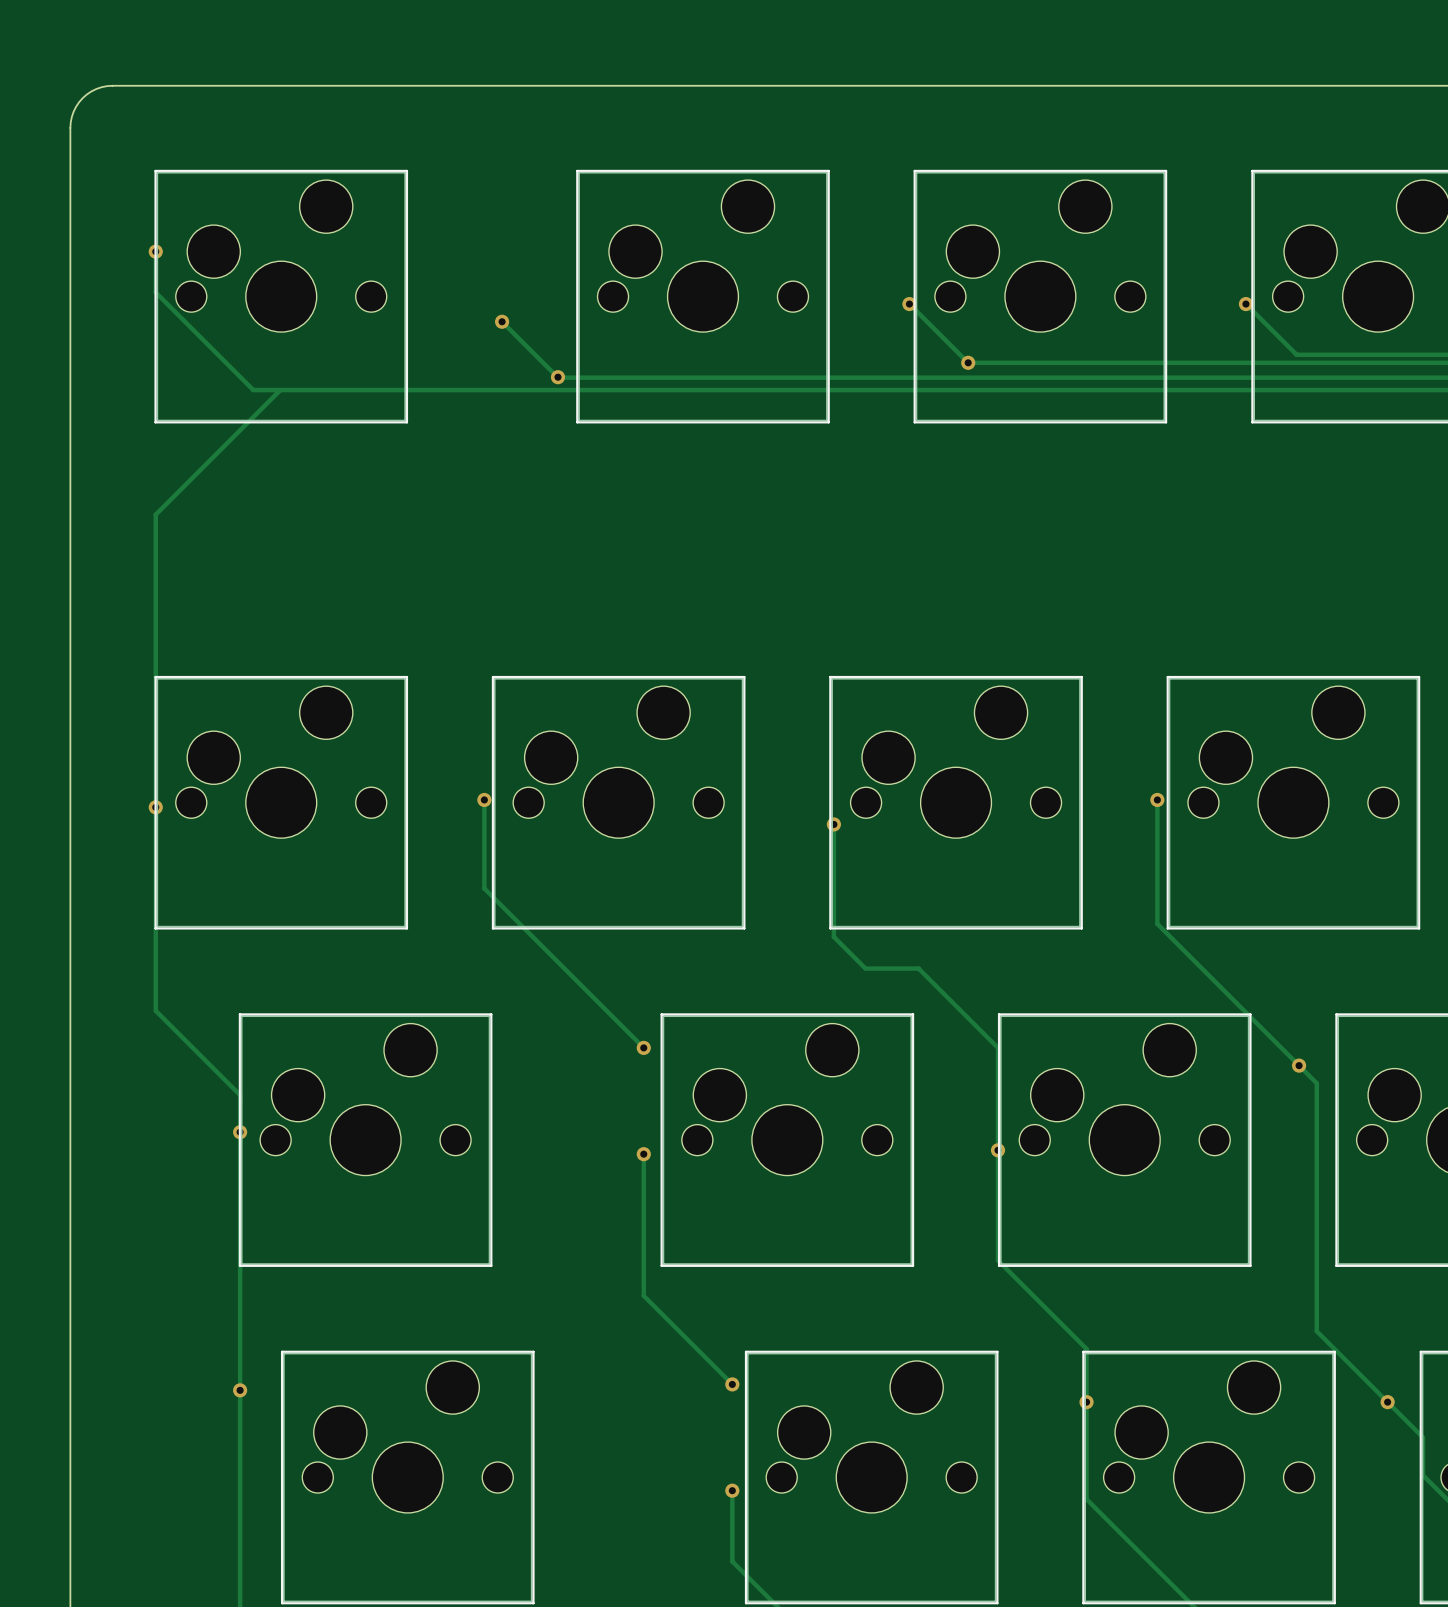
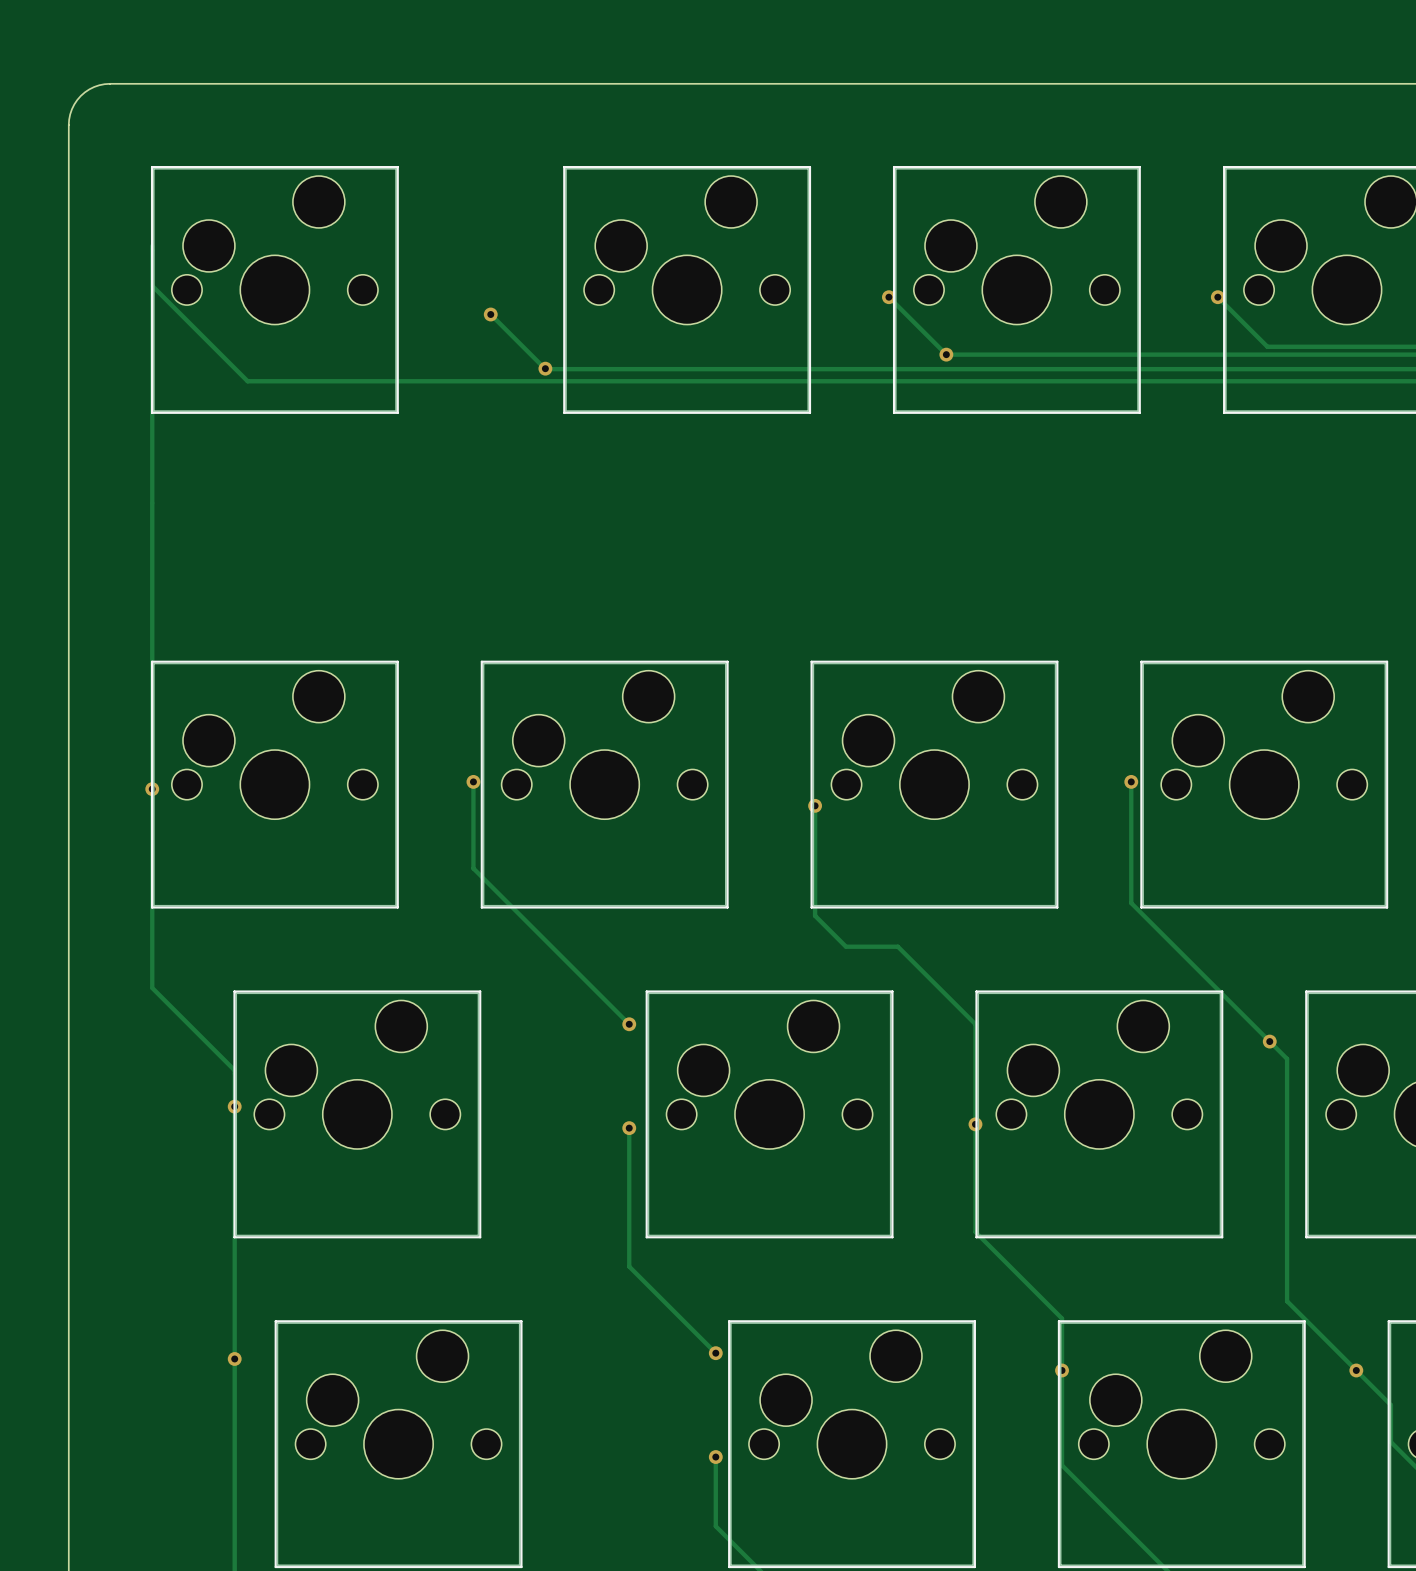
via: (155, 251) -> none
track: (280, 390) (155, 514) -> (152, 250) (152, 503)

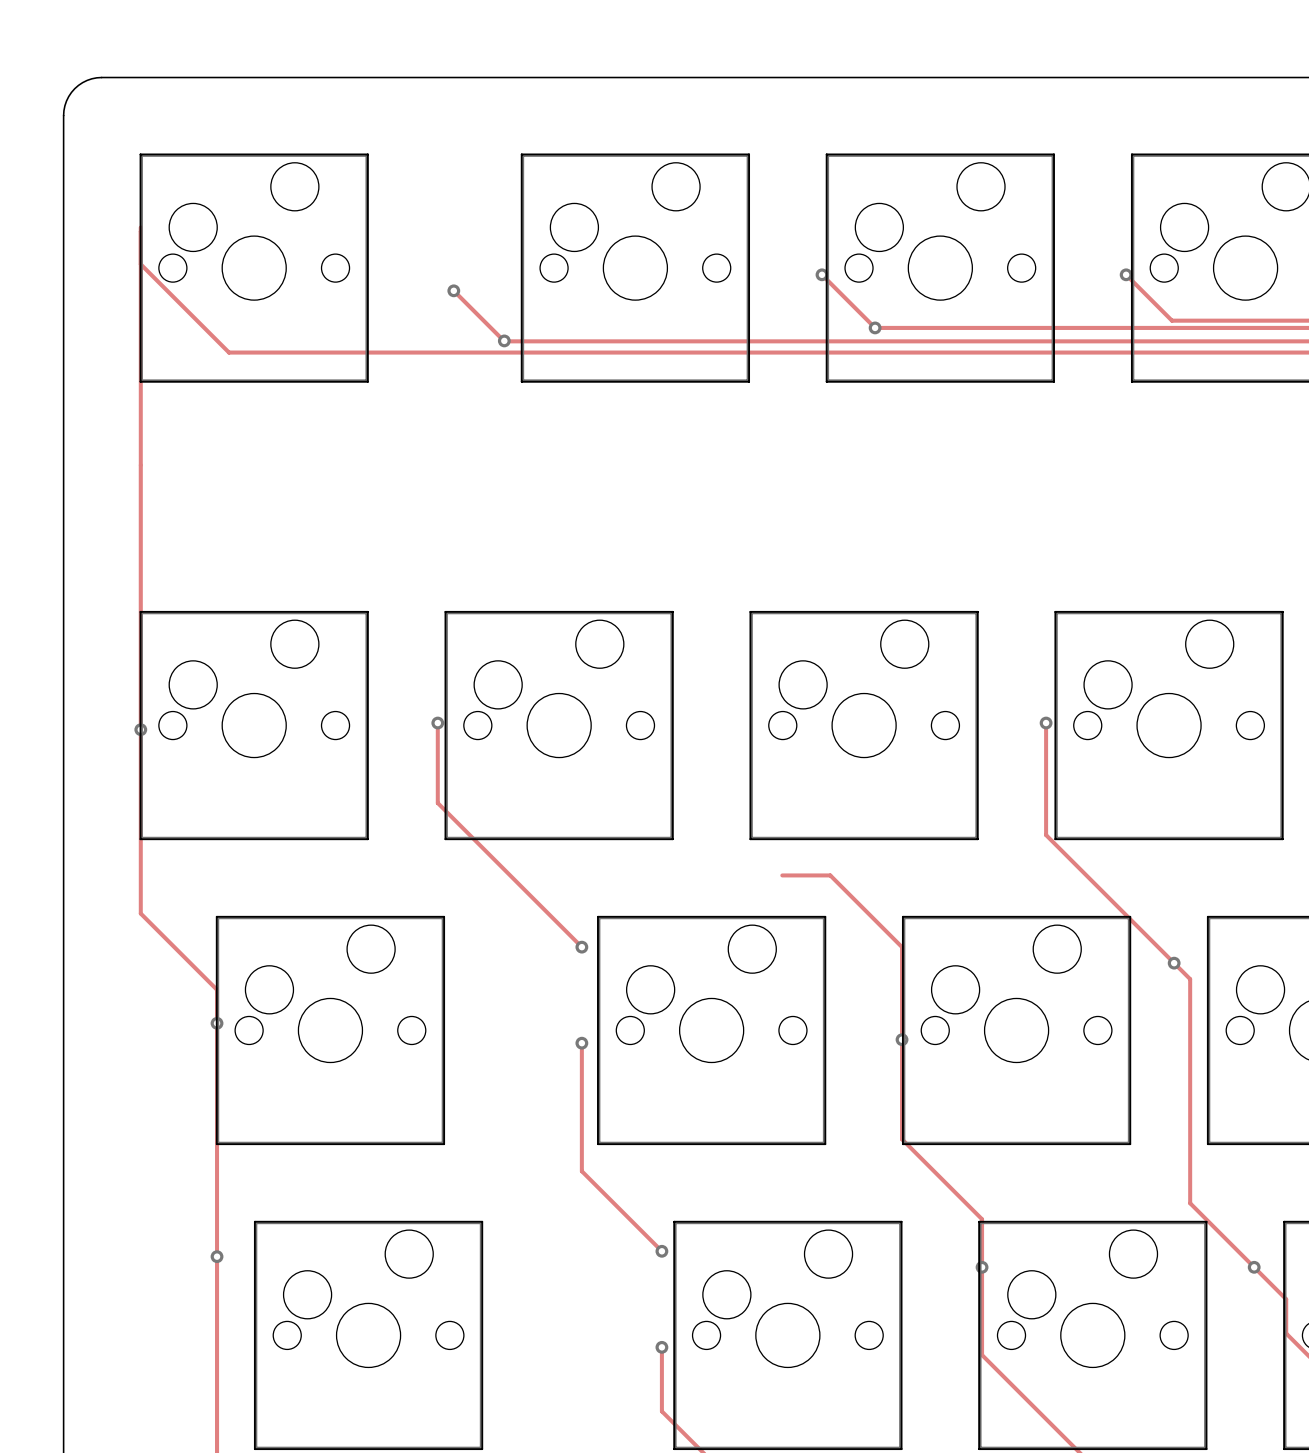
track: (815, 805) (815, 915) (846, 946) -> none
via: (815, 805) -> none

